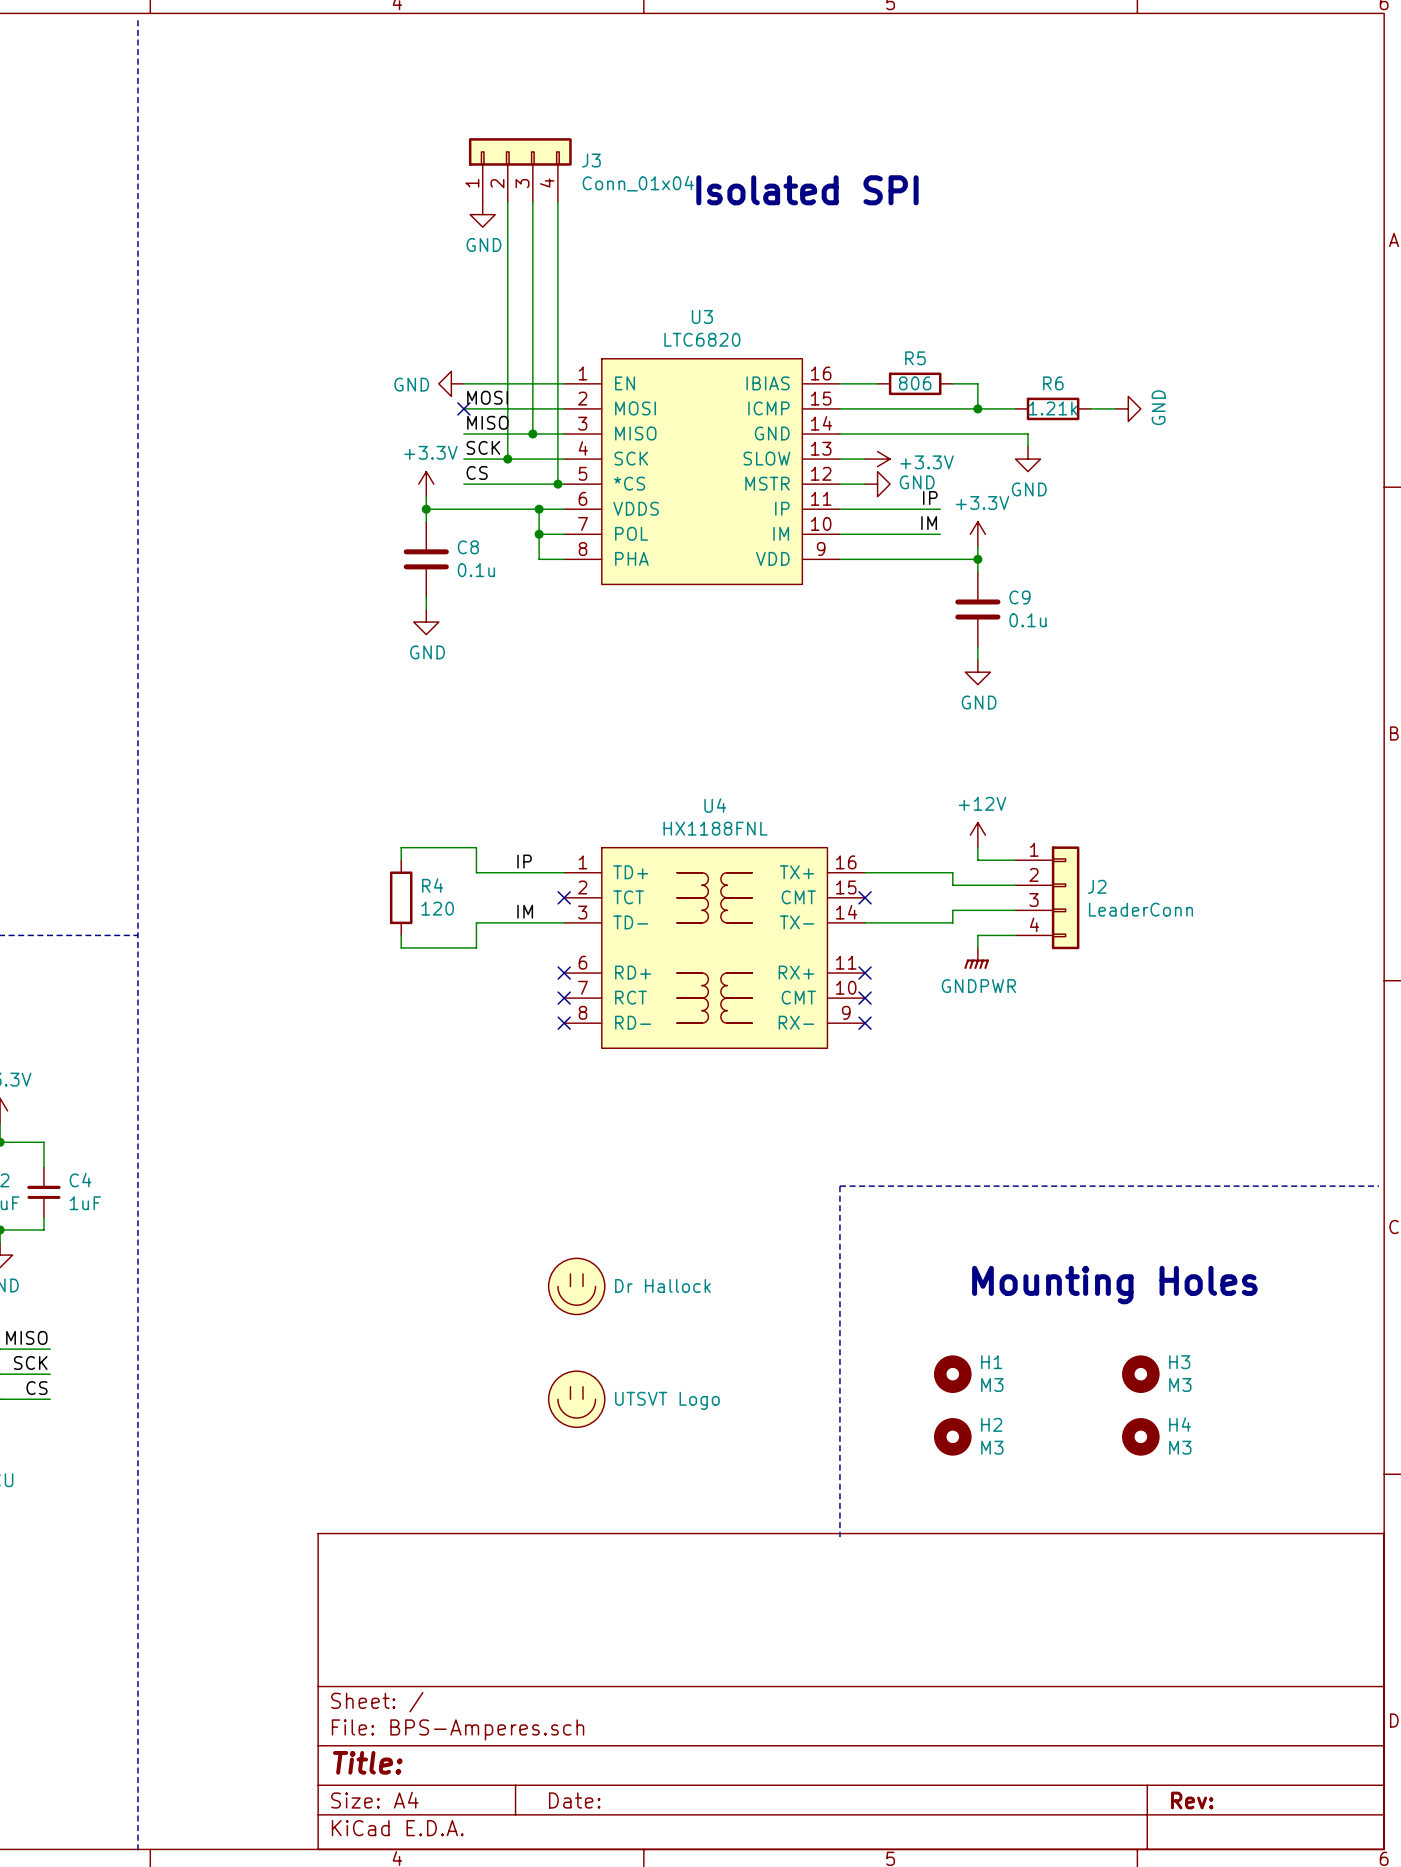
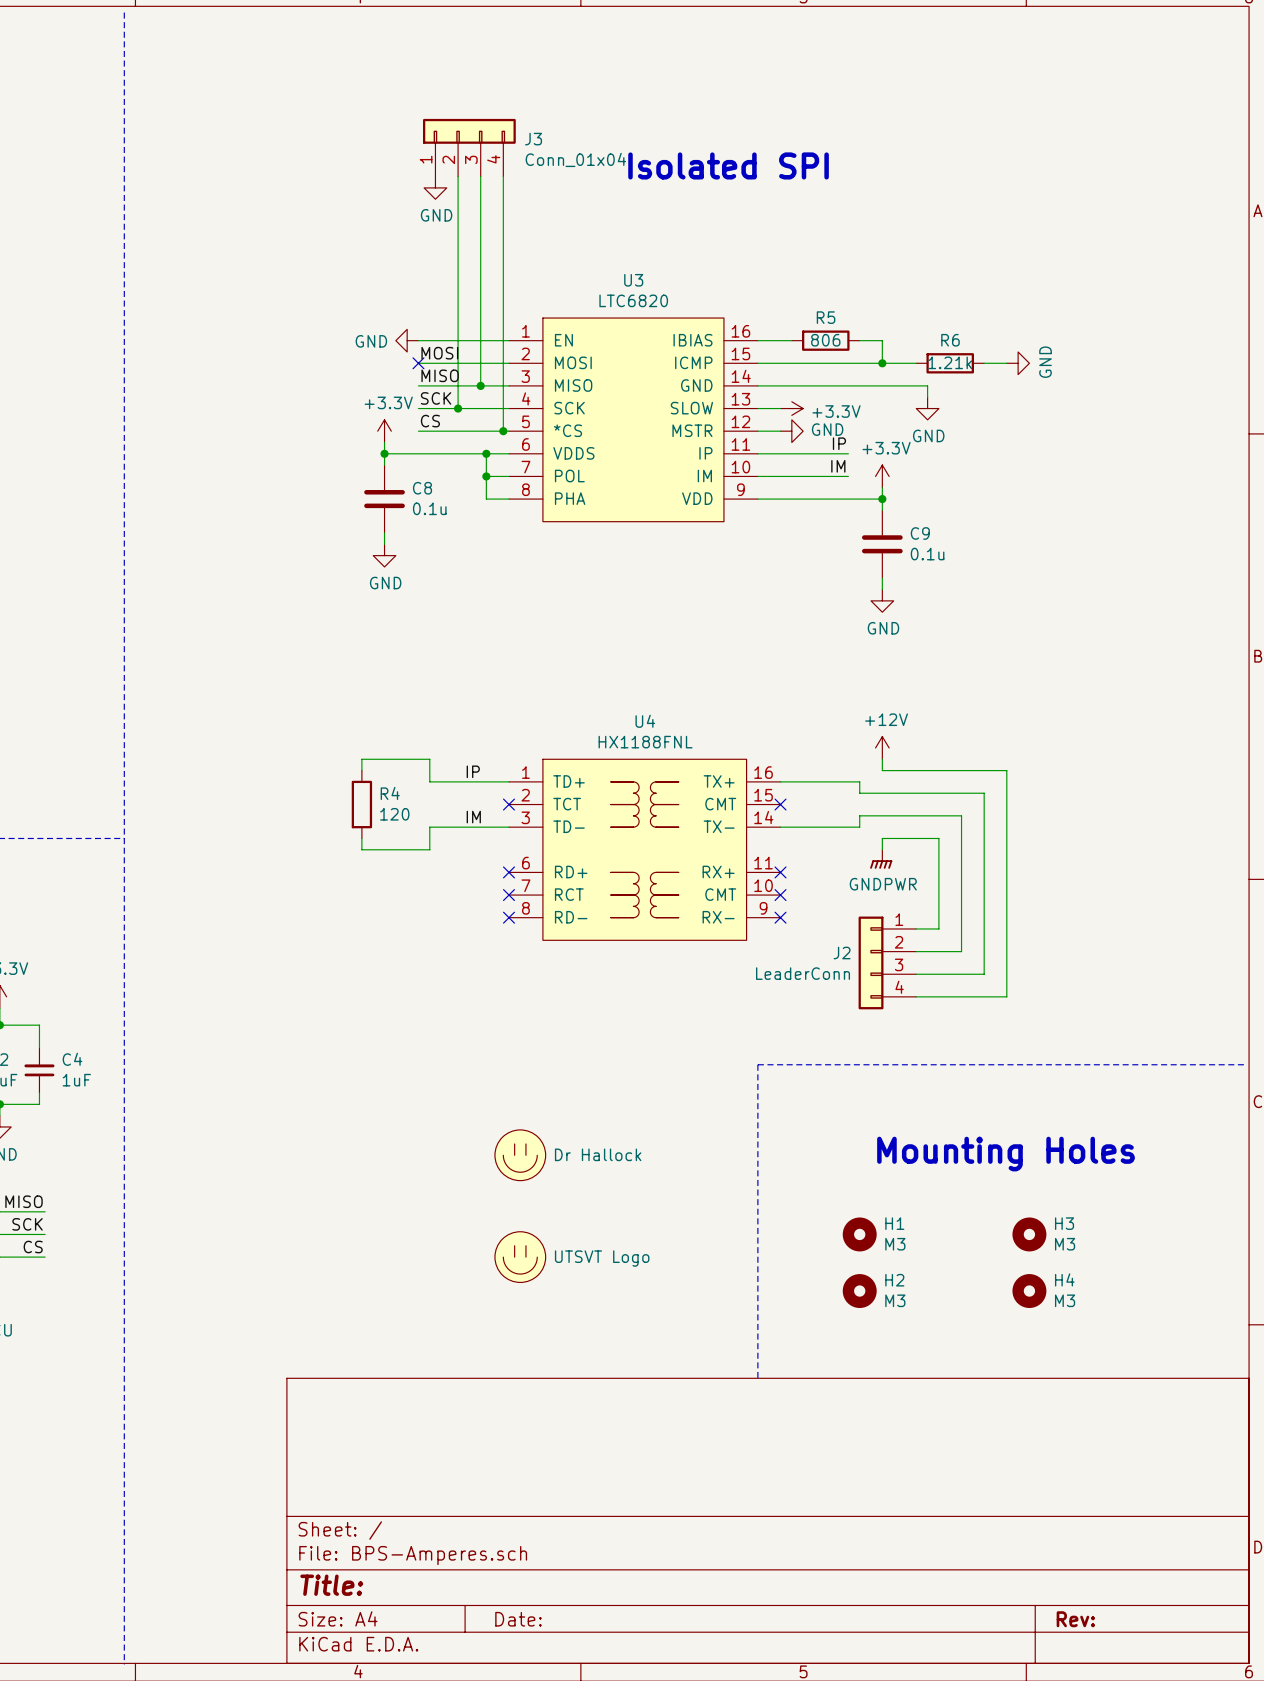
wire: none -> (916, 770) (1006, 770) (1006, 996) (916, 996)
wire: none -> (916, 793) (984, 793) (984, 974) (916, 974)
J2 position: (1047, 897) -> (887, 962)
J2 flip: as is (1065, 897) -> left-right (871, 962)
wire: none -> (916, 815) (961, 815) (961, 951) (916, 951)
wire: none -> (916, 838) (938, 838) (938, 928) (916, 928)

